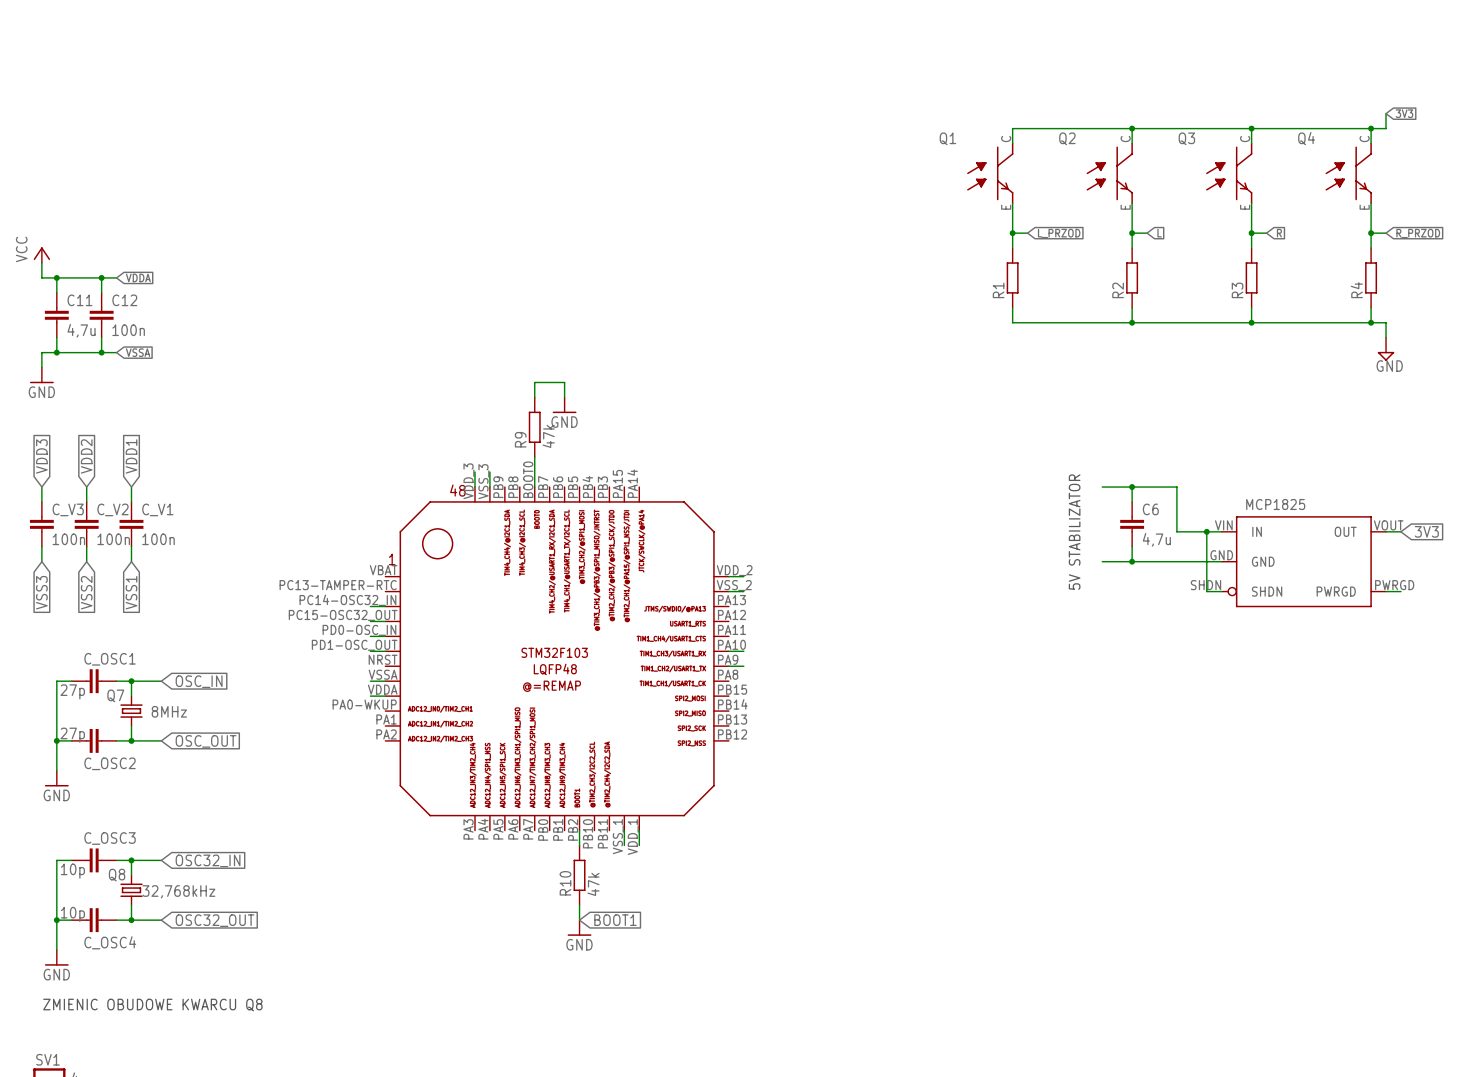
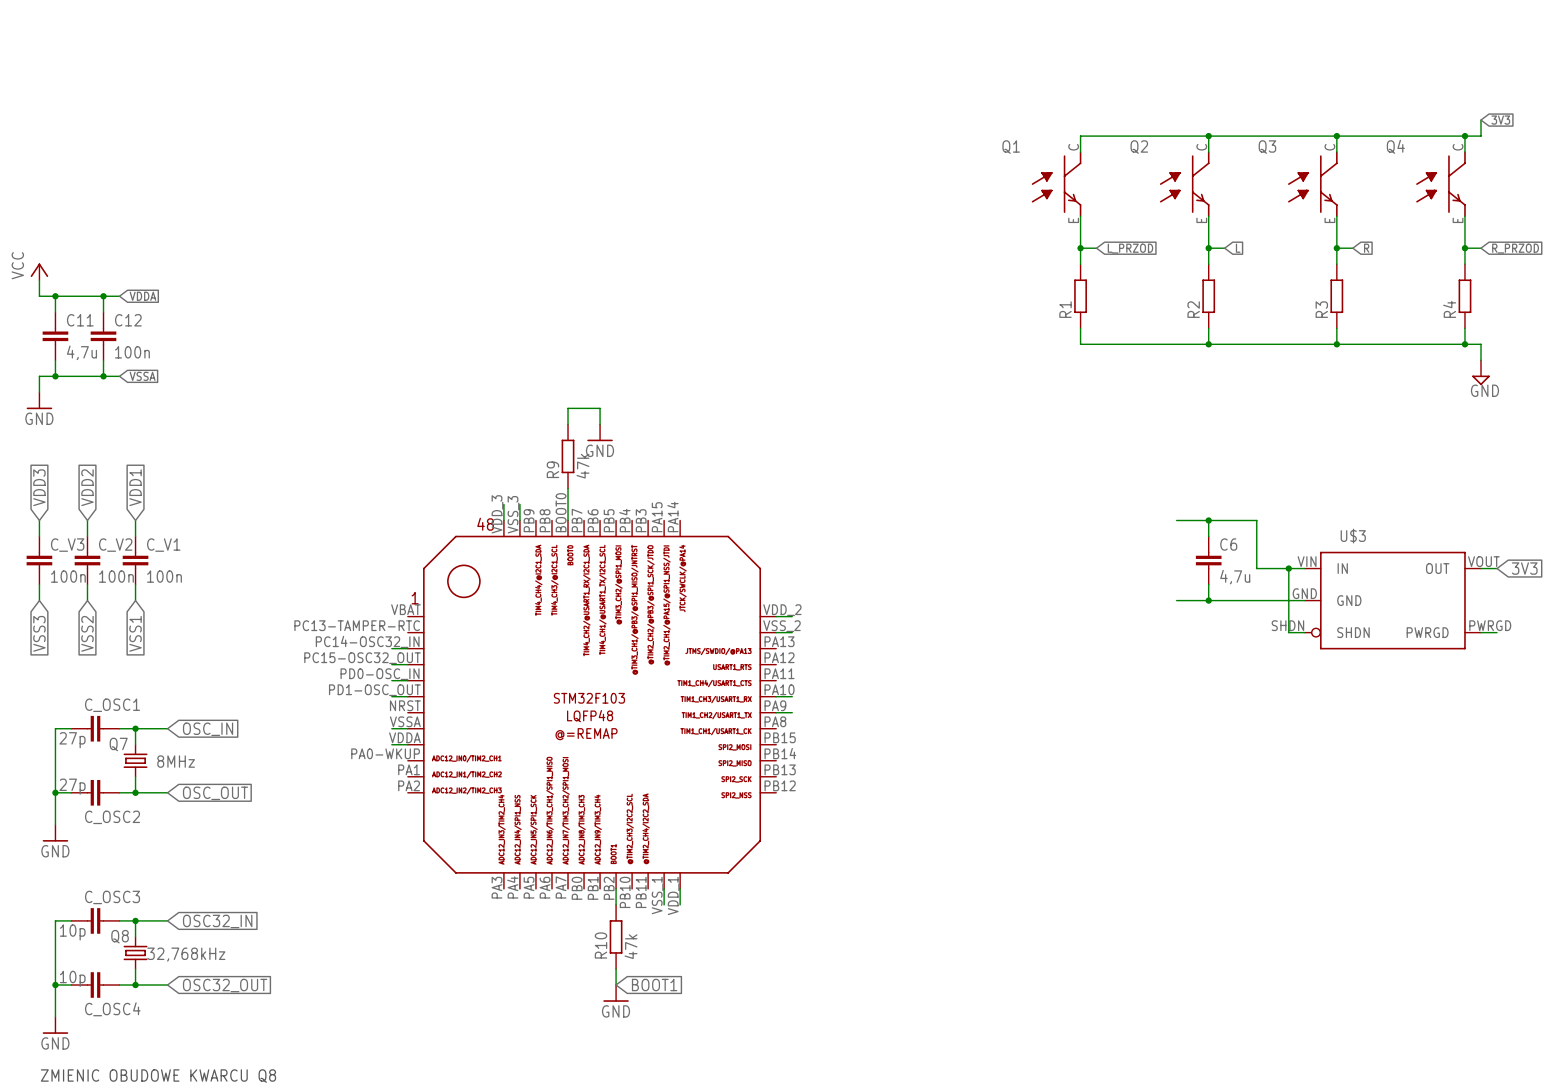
U$3 name: none -> U$3 (1353, 536)
U$3 text: MCP1825 (1275, 504) -> none
text: 5V STABILIZATOR (1074, 532) -> none

